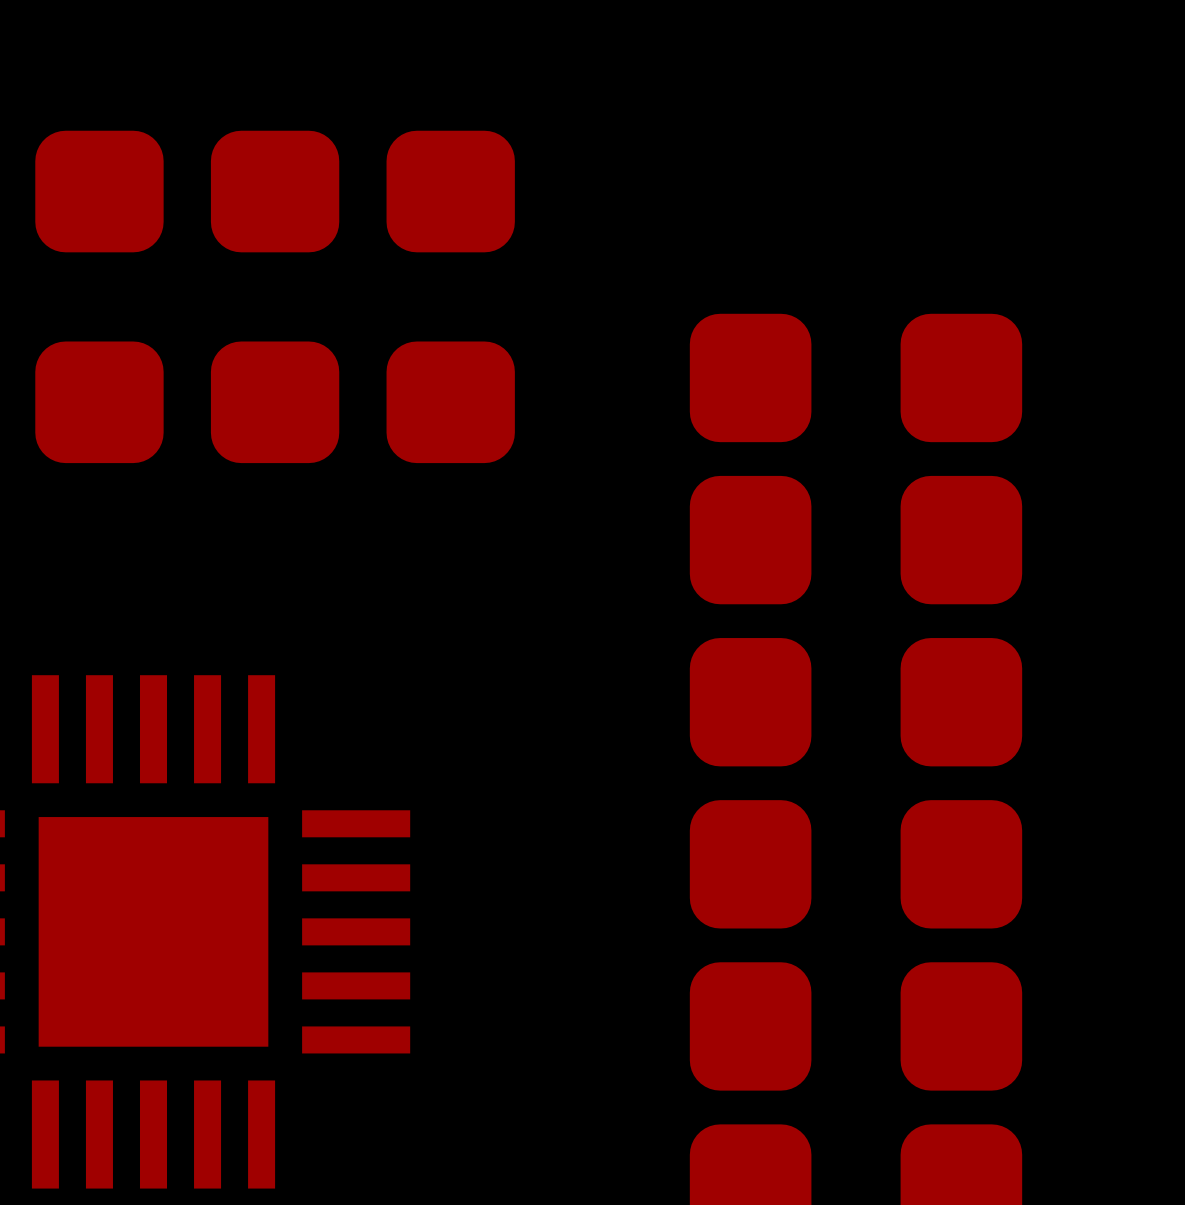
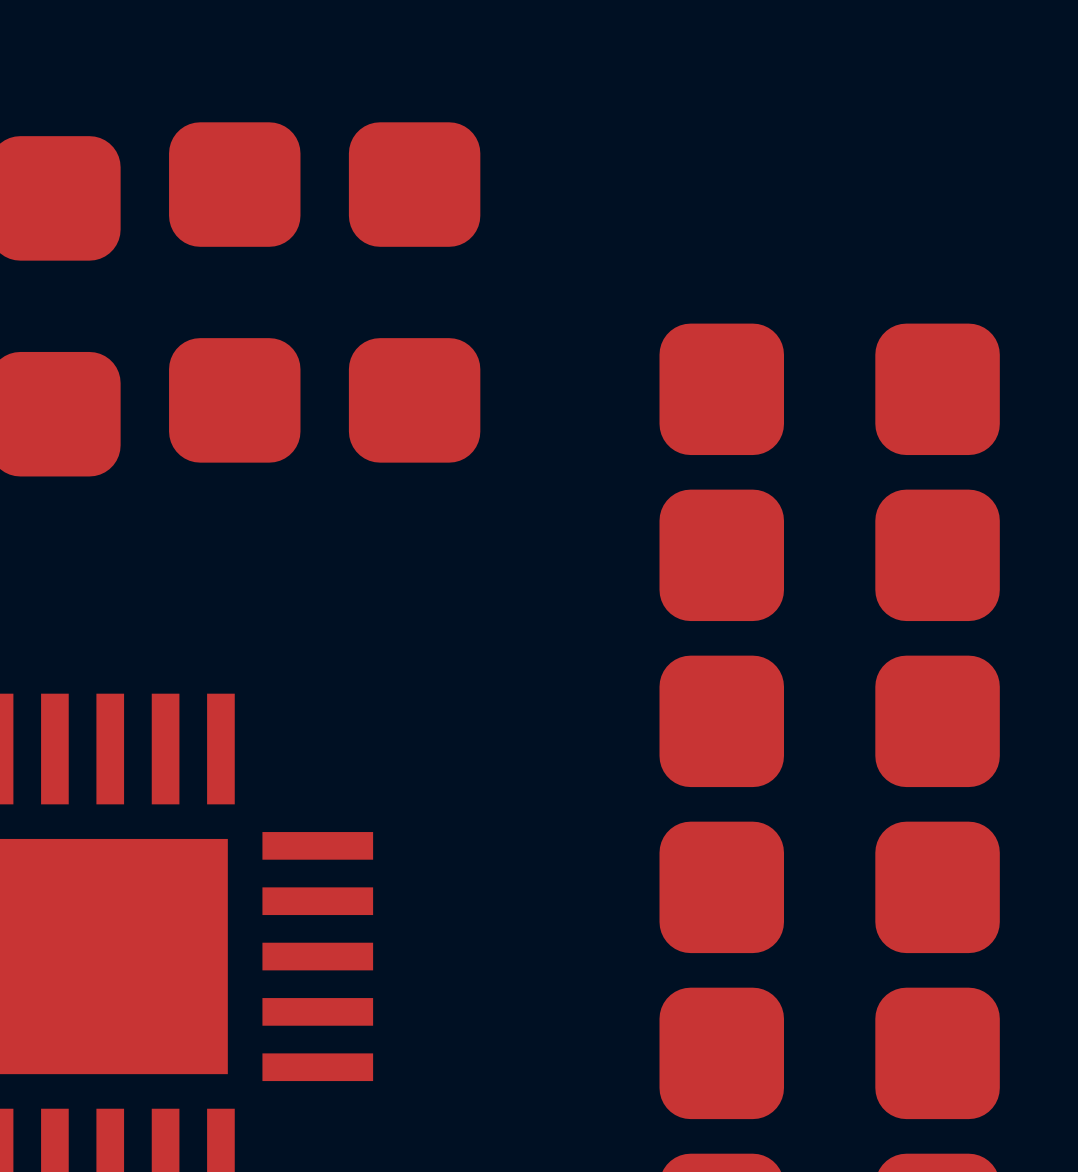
part position: (275, 296) -> (234, 292)
part position: (450, 296) -> (414, 292)

